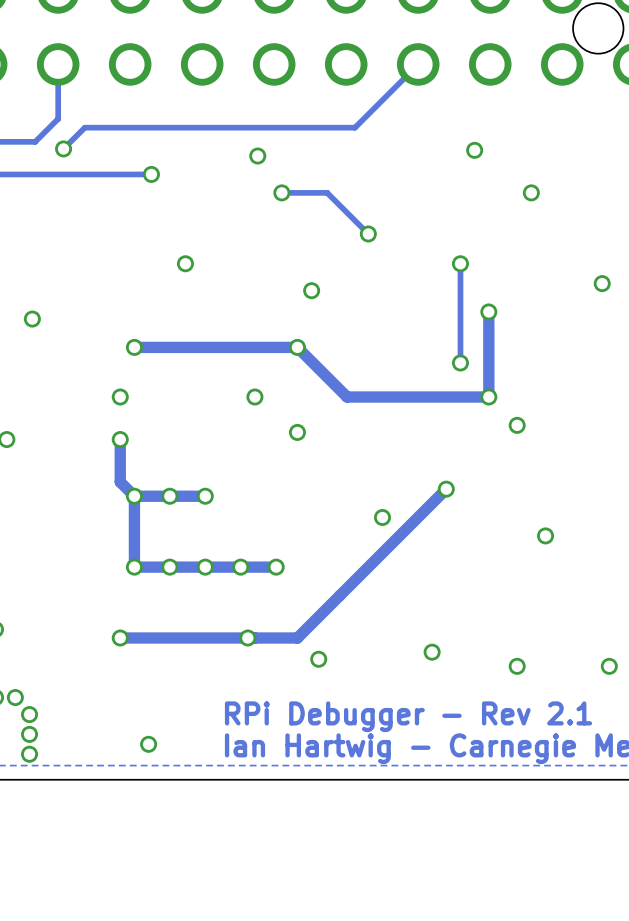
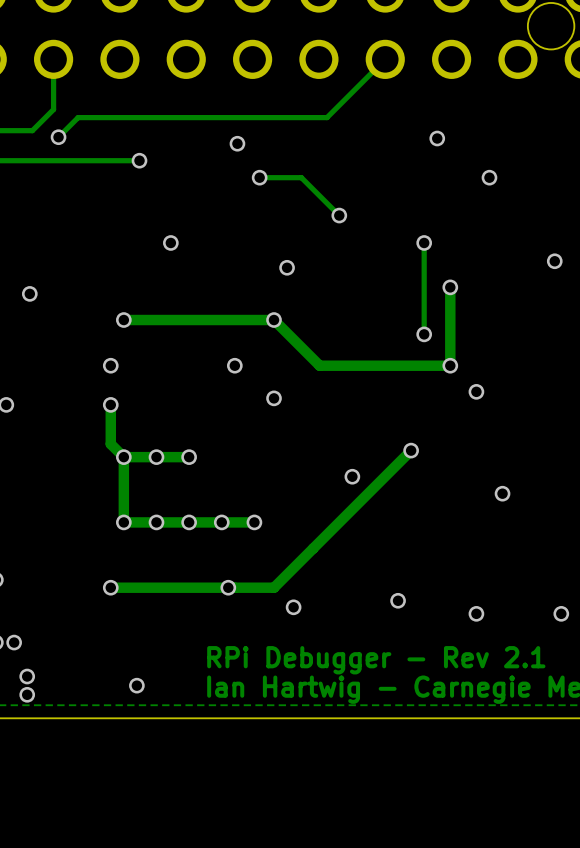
via: (29, 714) -> none

